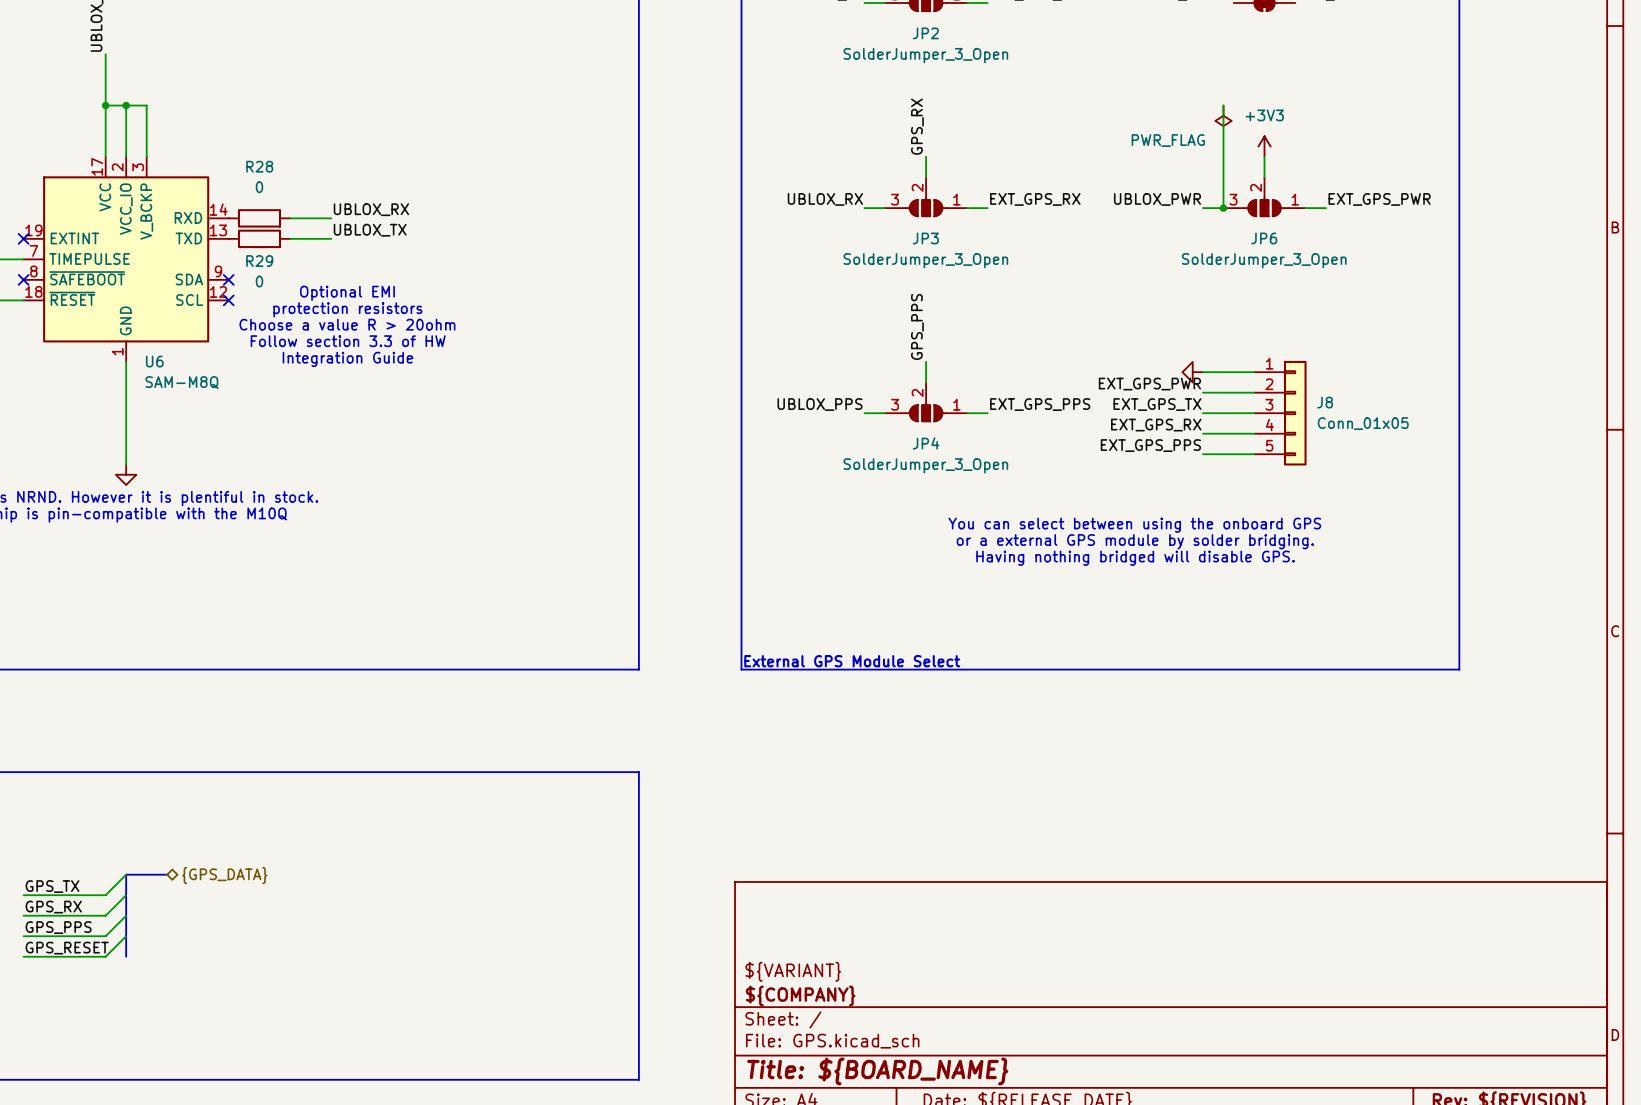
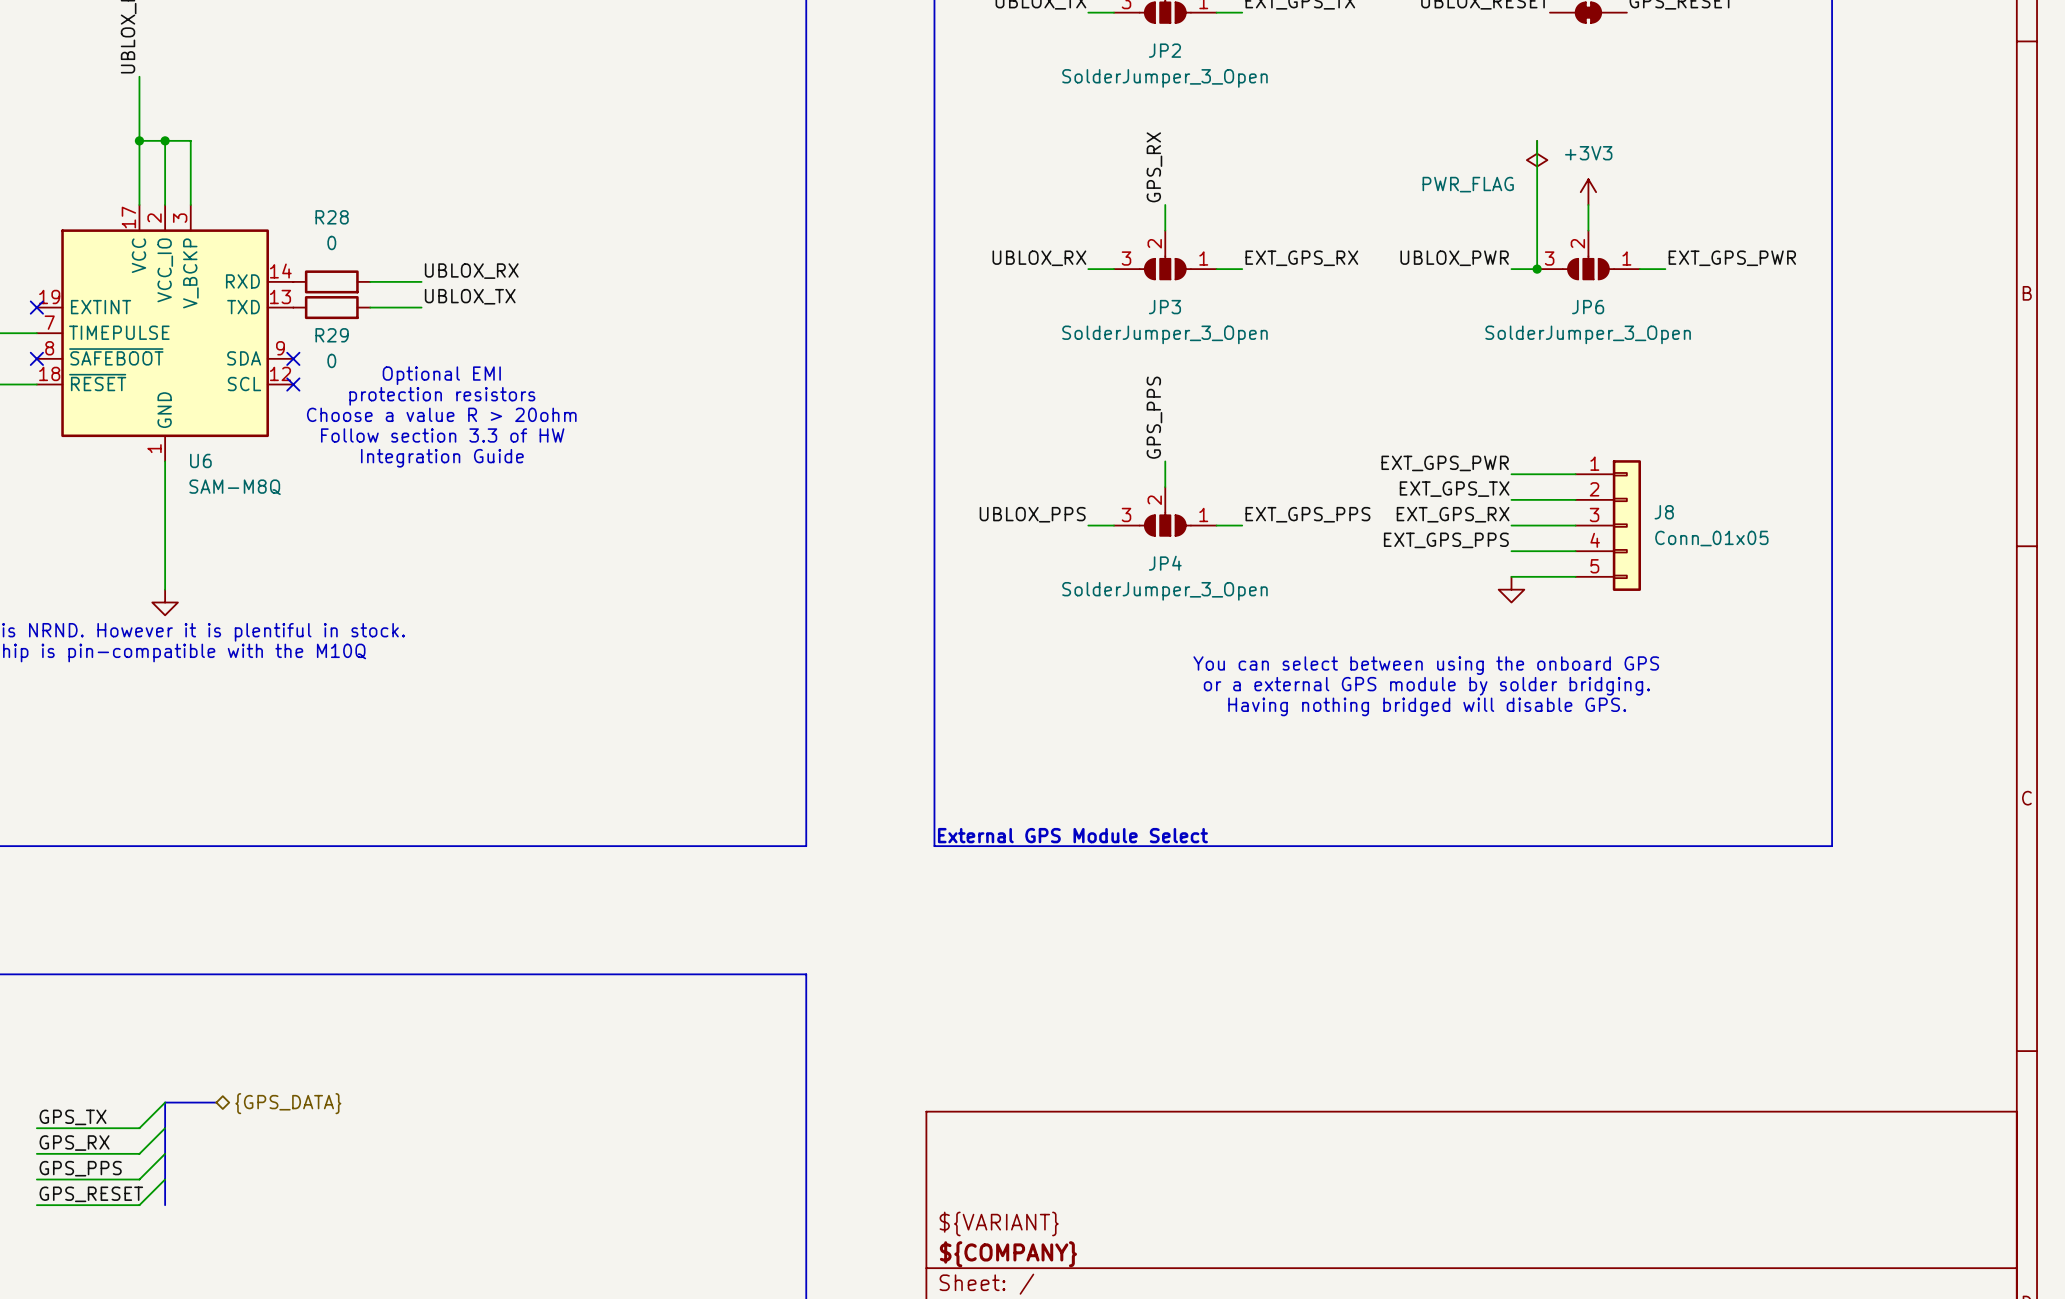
label: none -> EXT_GPS_PWR (1445, 463)
power symbol rotation: 0° (1192, 372) -> 90° counterclockwise (1511, 589)
power symbol position: (1192, 372) -> (1511, 589)
label: EXT_GPS_PWR (1149, 384) -> EXT_GPS_TX (1454, 489)
label: EXT_GPS_TX (1157, 404) -> EXT_GPS_RX (1453, 514)
label: EXT_GPS_RX (1156, 425) -> EXT_GPS_PPS (1446, 540)
label: EXT_GPS_PPS (1150, 445) -> none

